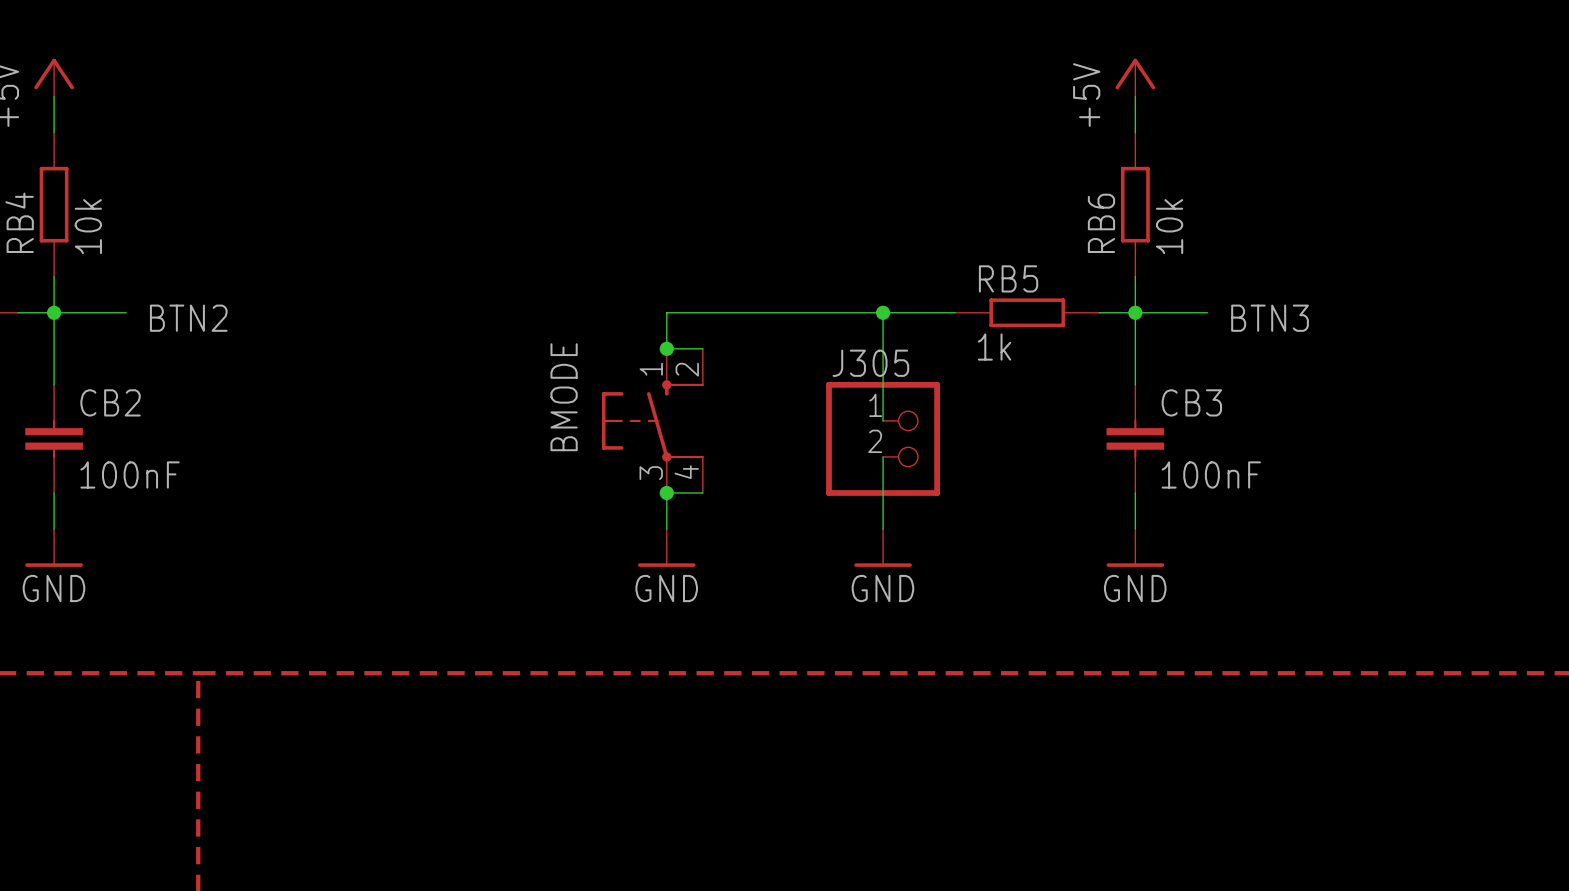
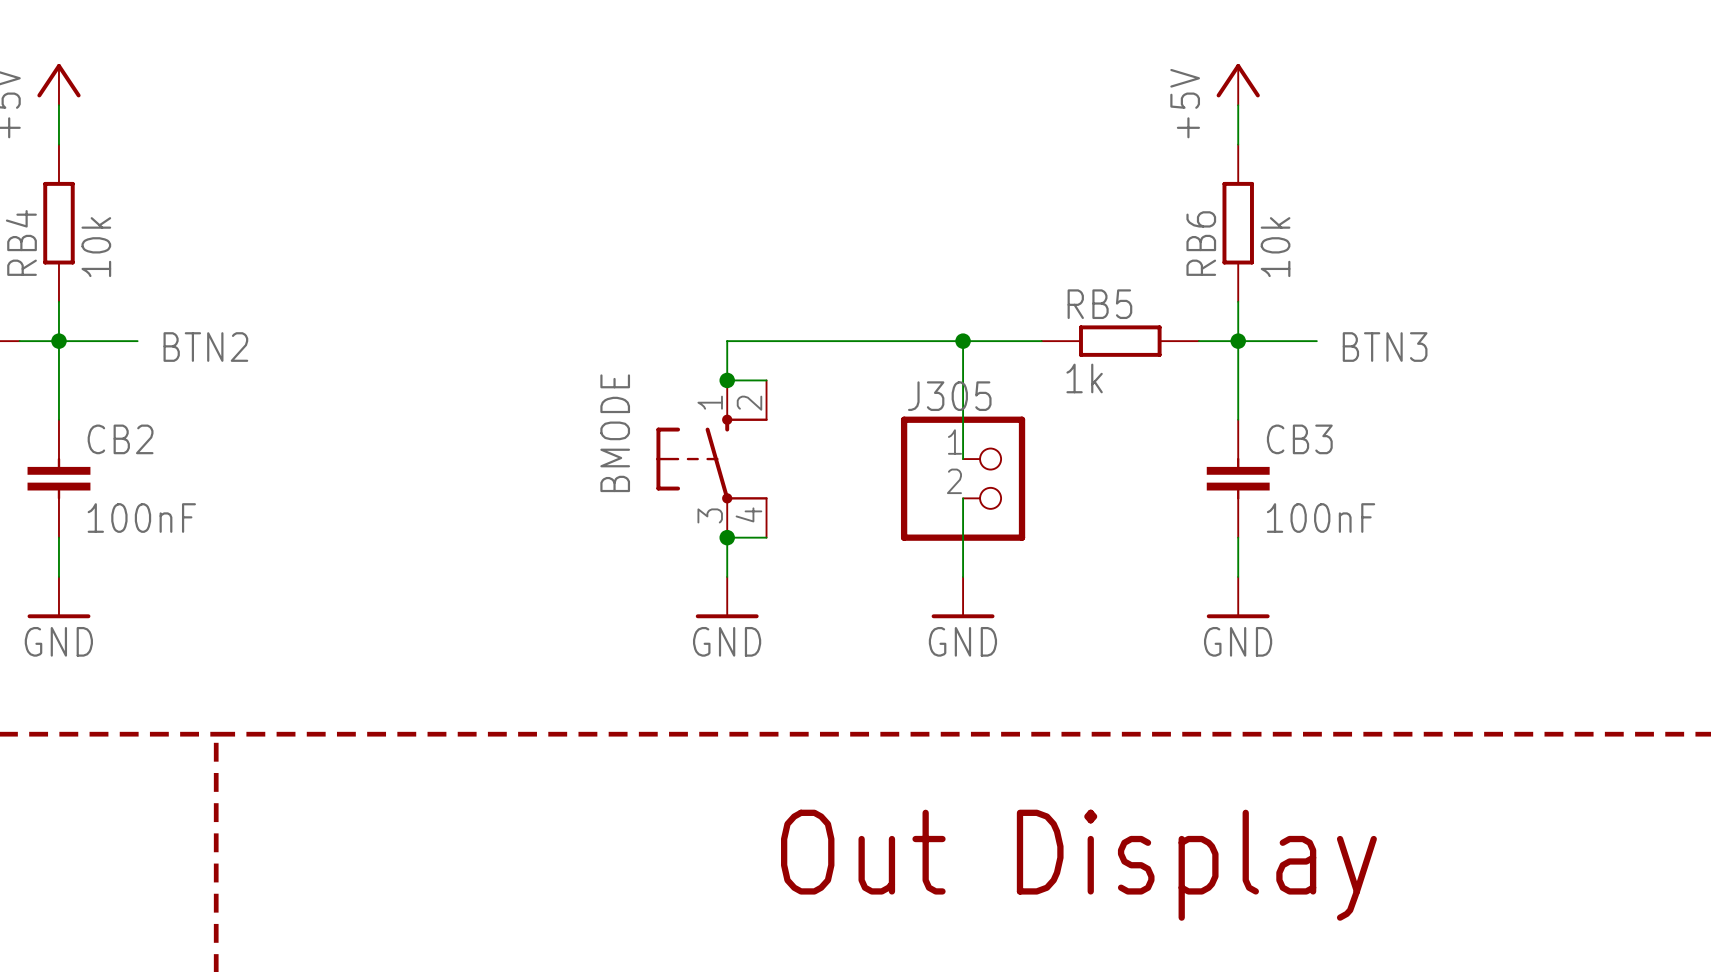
text: none -> Out Display (1078, 865)

